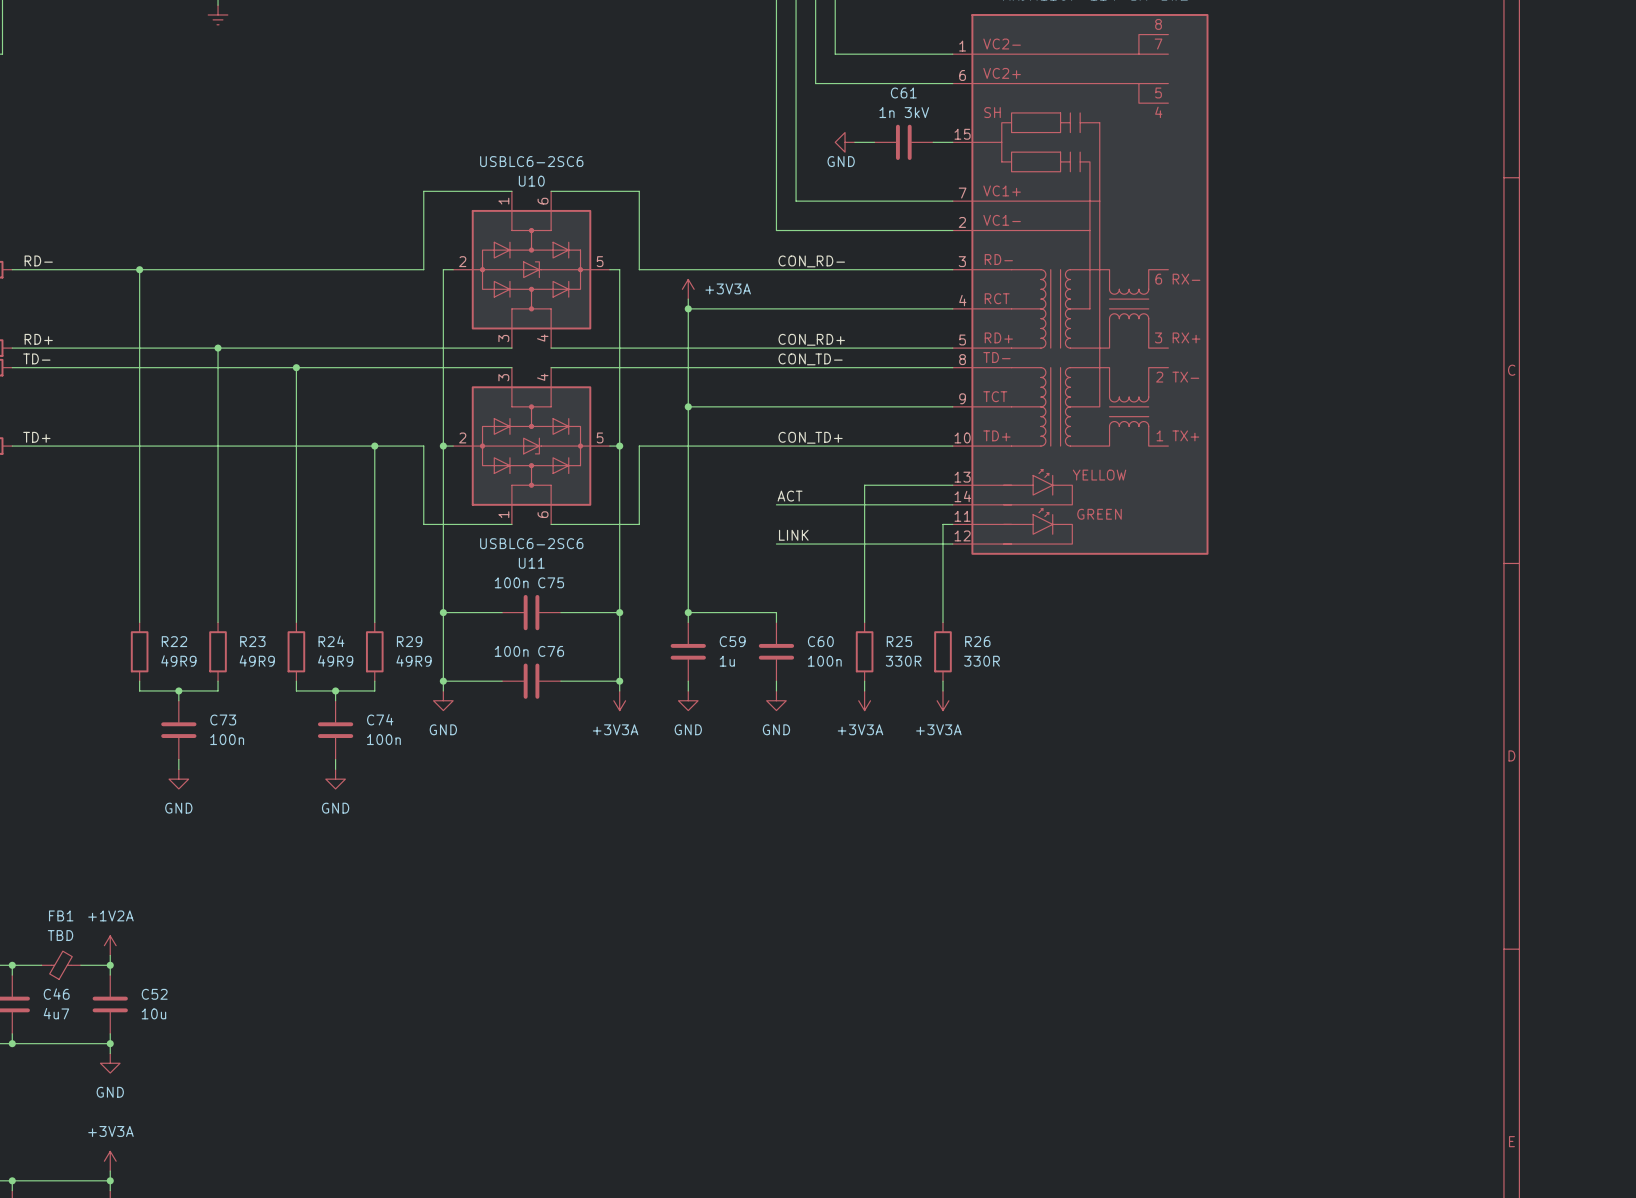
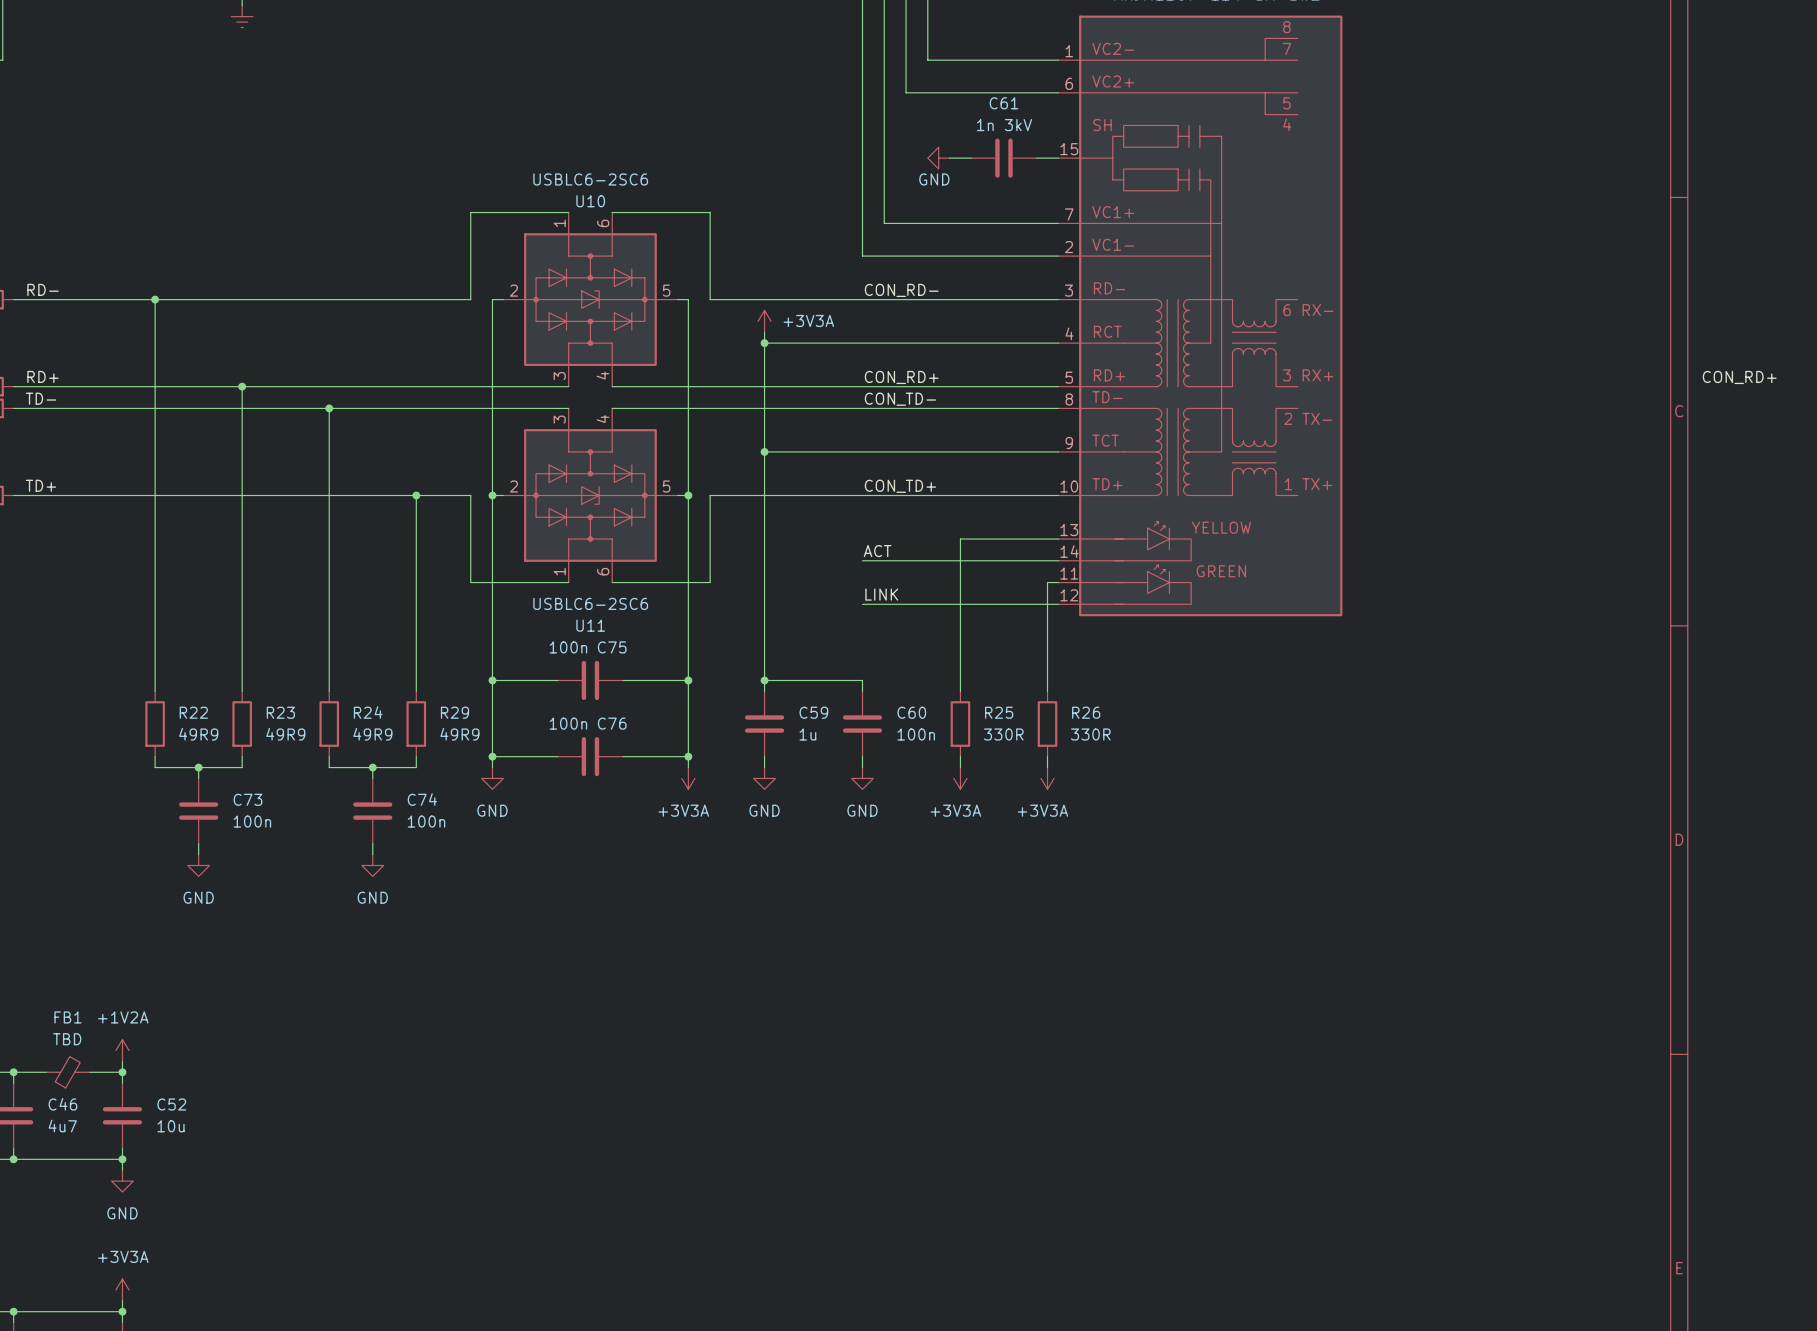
label: none -> CON_RD+ (1739, 377)

